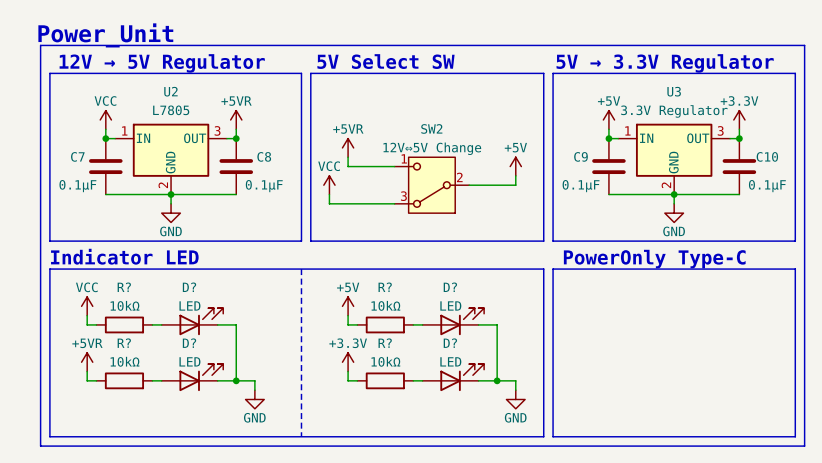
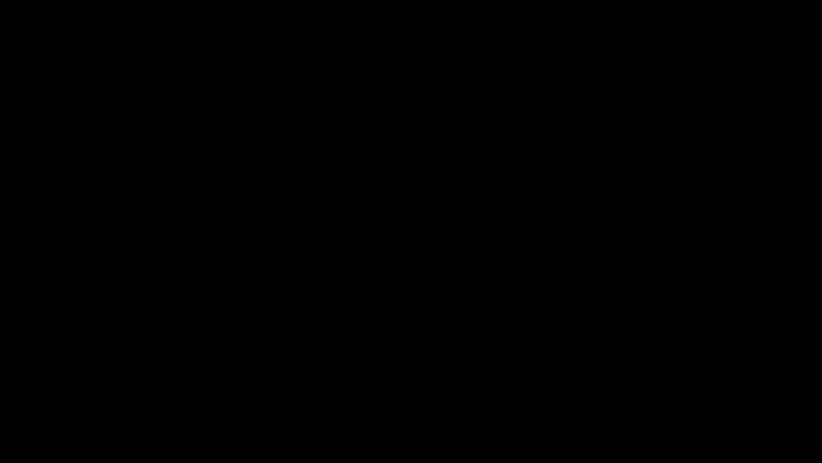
text: Power_Unit (105, 35) -> none
line: (40, 45) (804, 45) (804, 446) (40, 446) (40, 45) -> none
text: 5V Select SW (386, 61) -> none
text: 12V → 5V Regulator (162, 63) -> none
text: 5V → 3.3V Regulator (665, 63) -> none
line: (49, 73) (301, 73) (301, 241) (49, 241) (49, 73) -> none
line: (310, 73) (543, 73) (543, 241) (310, 241) (310, 73) -> none
line: (553, 73) (795, 73) (795, 241) (553, 241) (553, 73) -> none
power symbol: VCC (105, 119) -> none
power symbol: +5VR (236, 119) -> none
power symbol: +5V (608, 119) -> none
power symbol: +3.3V (739, 119) -> none
wire: (105, 129) (105, 138) (115, 138) -> none
wire: (236, 129) (236, 138) (226, 138) -> none
wire: (608, 129) (608, 138) (618, 138) -> none
wire: (739, 129) (739, 138) (730, 138) -> none
junction: (105, 138) -> none
junction: (236, 138) -> none
junction: (608, 138) -> none
junction: (739, 138) -> none
power symbol: +5VR (348, 147) -> none
wire: (348, 157) (348, 166) (394, 166) -> none
U2: L7805 (171, 159) -> none
U3: 3.3V Regulator (674, 159) -> none
C7: 0.1μF (105, 166) -> none
C8: 0.1μF (236, 166) -> none
power symbol: +5V (515, 166) -> none
C9: 0.1μF (608, 166) -> none
C10: 0.1μF (739, 166) -> none
wire: (515, 175) (515, 185) (469, 185) -> none
power symbol: VCC (329, 185) -> none
SW2: 12V⇔5V Change (431, 185) -> none
wire: (105, 194) (236, 194) -> none
wire: (171, 194) (171, 203) -> none
junction: (171, 194) -> none
wire: (329, 194) (329, 203) (394, 203) -> none
wire: (608, 194) (739, 194) -> none
wire: (674, 194) (674, 203) -> none
junction: (674, 194) -> none
power symbol: GND (171, 213) -> none
power symbol: GND (674, 213) -> none
text: Indicator LED (124, 256) -> none
text: PowerOnly Type-C (654, 259) -> none
line: (49, 269) (543, 269) (543, 436) (49, 436) (49, 269) -> none
line: (301, 269) (301, 436) -> none
line: (553, 269) (553, 436) (795, 436) (795, 269) (553, 269) -> none
power symbol: VCC (87, 306) -> none
power symbol: +5V (348, 306) -> none
wire: (87, 315) (87, 324) (96, 324) -> none
wire: (348, 315) (348, 324) (357, 324) -> none
D?: LED (192, 321) -> none
D?: LED (453, 321) -> none
R?: 10kΩ (124, 324) -> none
wire: (152, 324) (161, 324) -> none
wire: (217, 324) (236, 324) (236, 380) -> none
R?: 10kΩ (385, 324) -> none
wire: (413, 324) (422, 324) -> none
wire: (478, 324) (497, 324) (497, 380) -> none
power symbol: +5VR (87, 362) -> none
power symbol: +3.3V (348, 362) -> none
wire: (87, 371) (87, 380) (96, 380) -> none
wire: (348, 371) (348, 380) (357, 380) -> none
D?: LED (192, 377) -> none
D?: LED (453, 377) -> none
R?: 10kΩ (124, 380) -> none
wire: (152, 380) (161, 380) -> none
wire: (217, 380) (254, 380) (254, 390) -> none
junction: (236, 380) -> none
R?: 10kΩ (385, 380) -> none
wire: (413, 380) (422, 380) -> none
wire: (478, 380) (515, 380) (515, 390) -> none
junction: (497, 380) -> none
power symbol: GND (254, 399) -> none
power symbol: GND (515, 399) -> none

